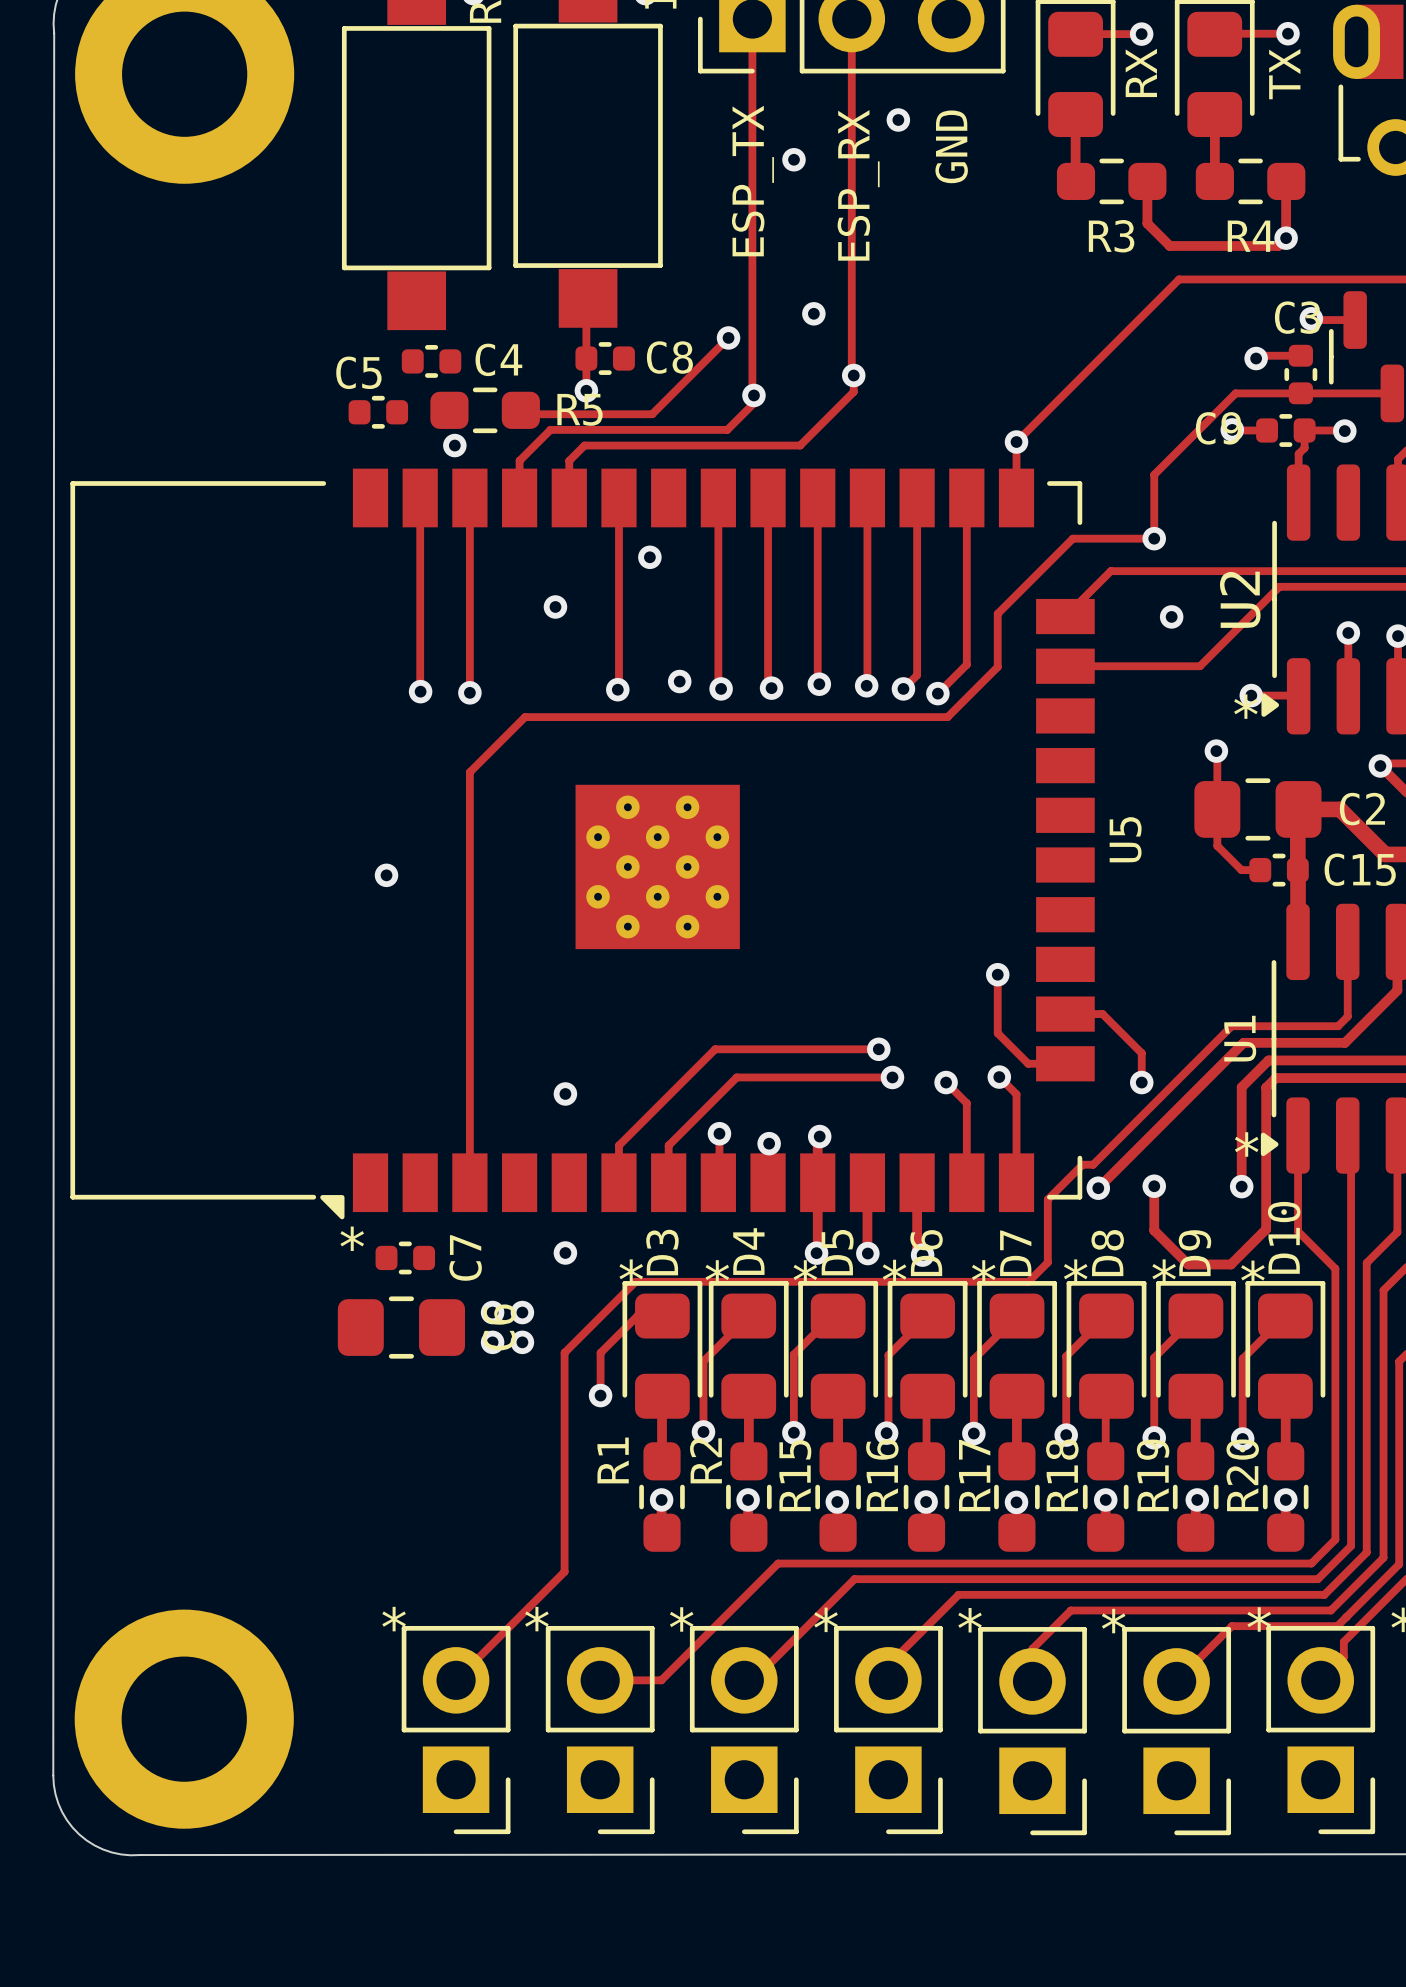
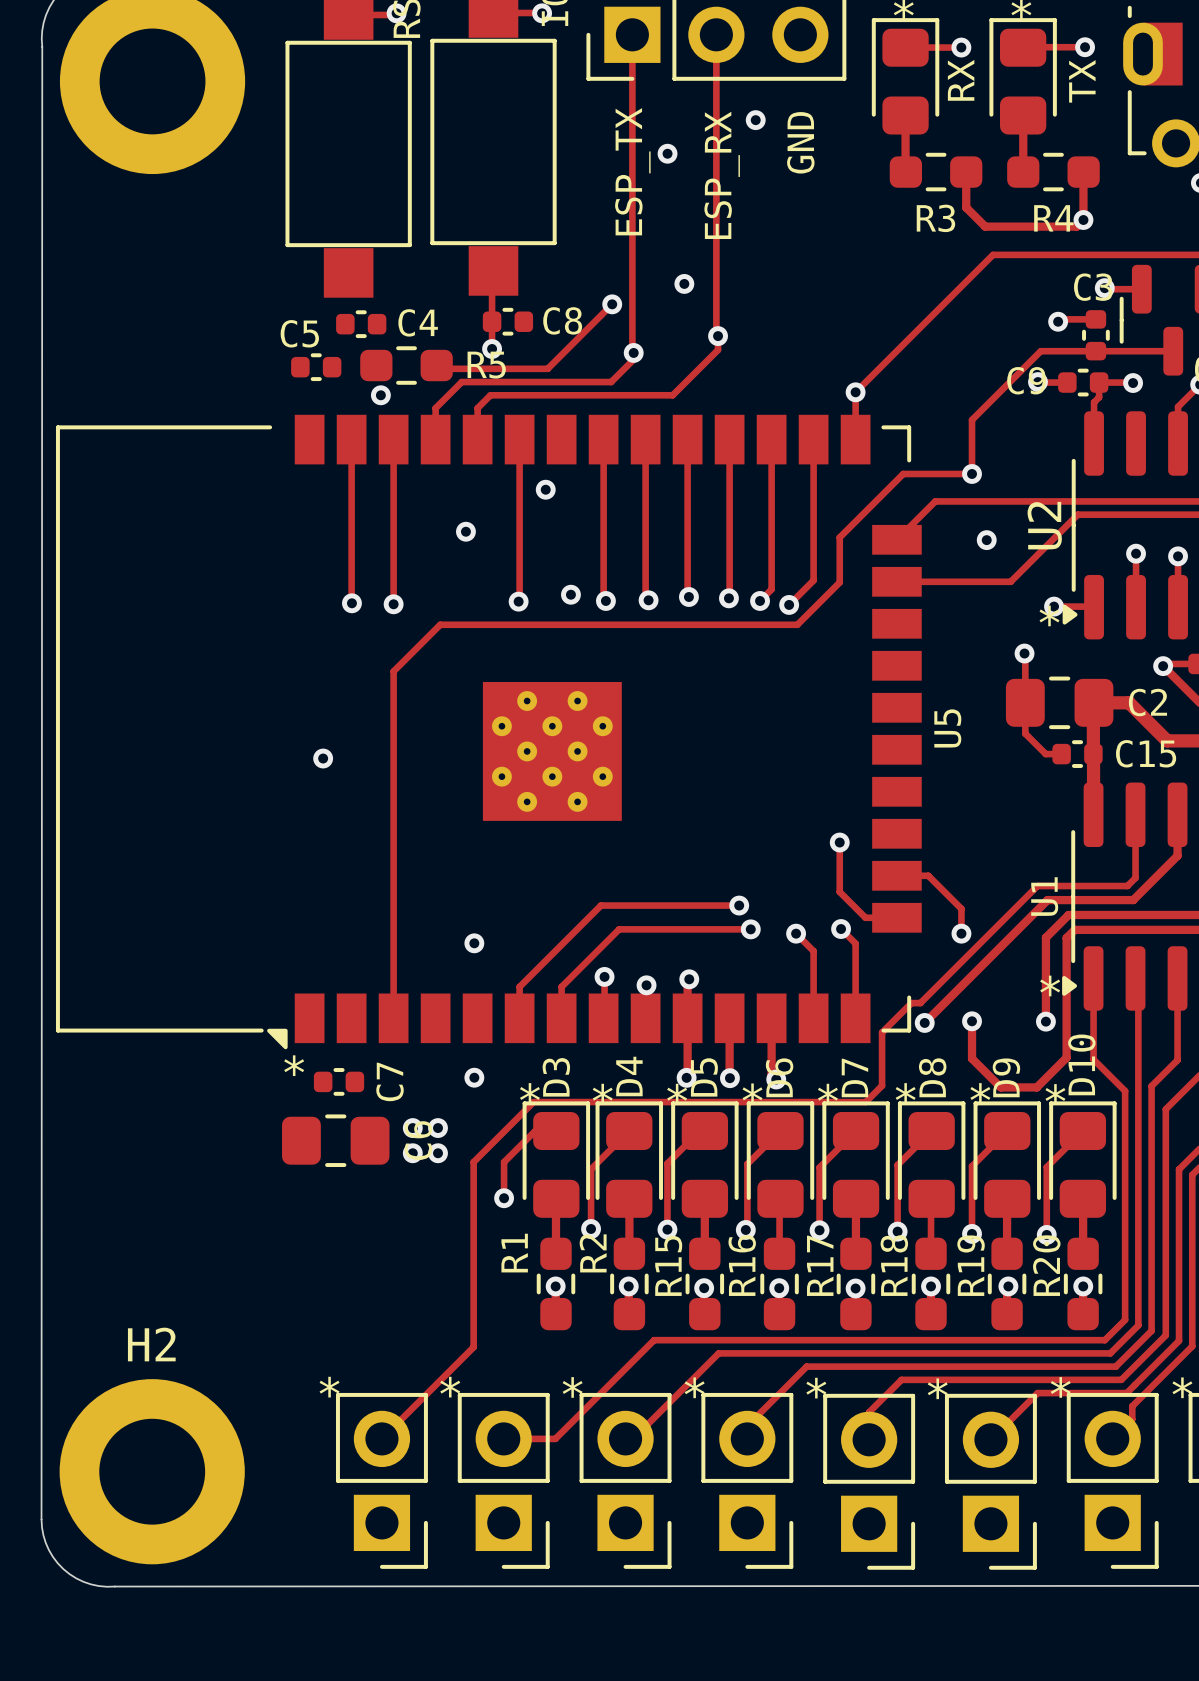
H2 name: none -> H2 (151, 1344)

